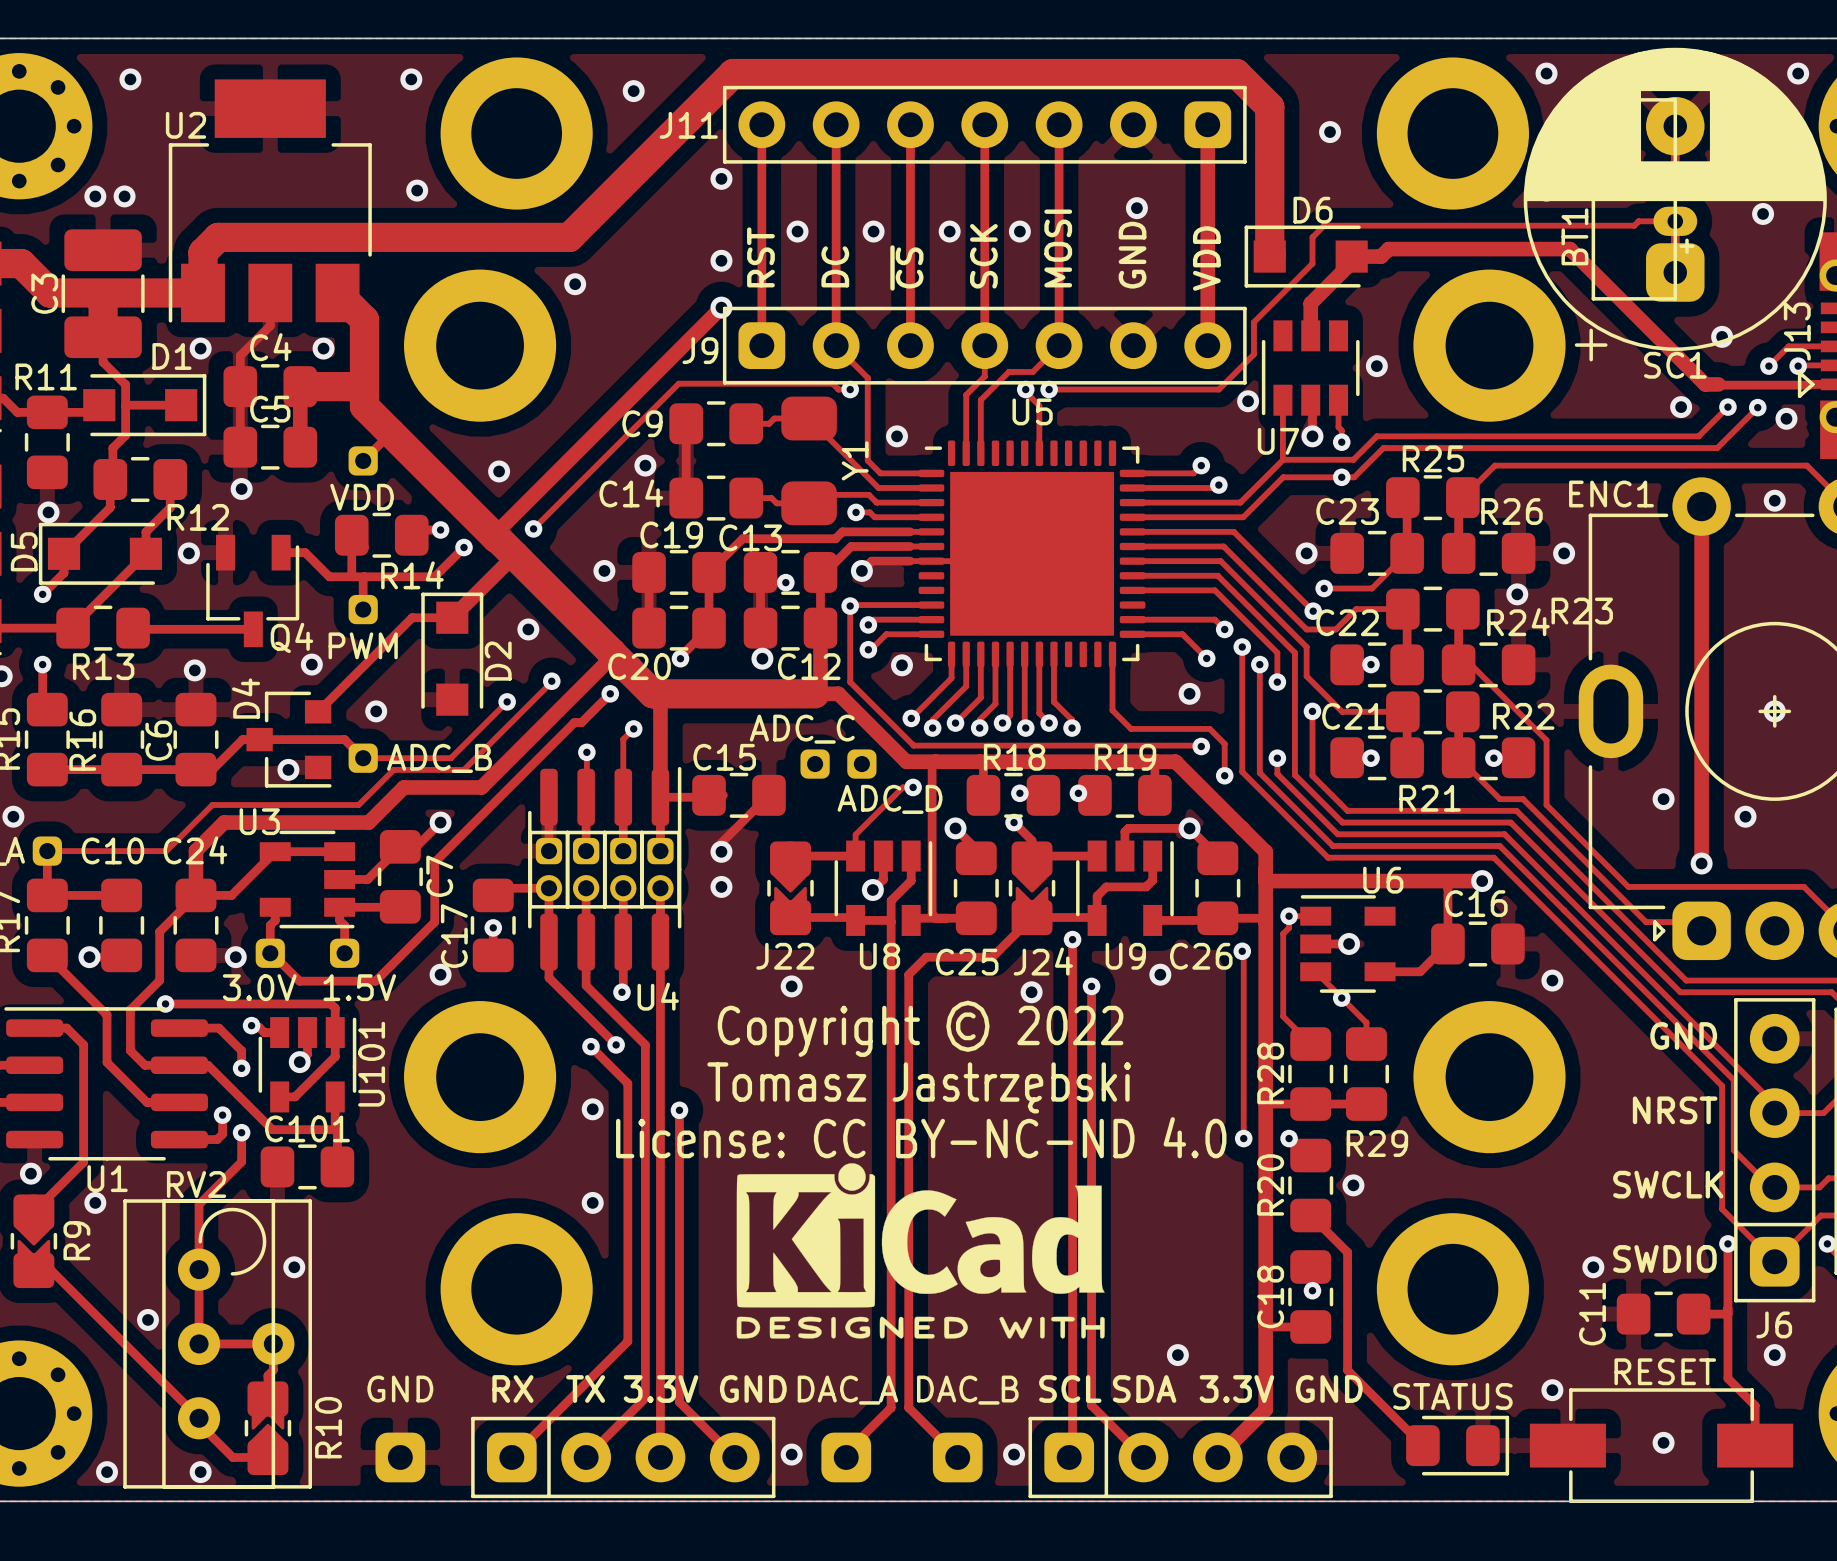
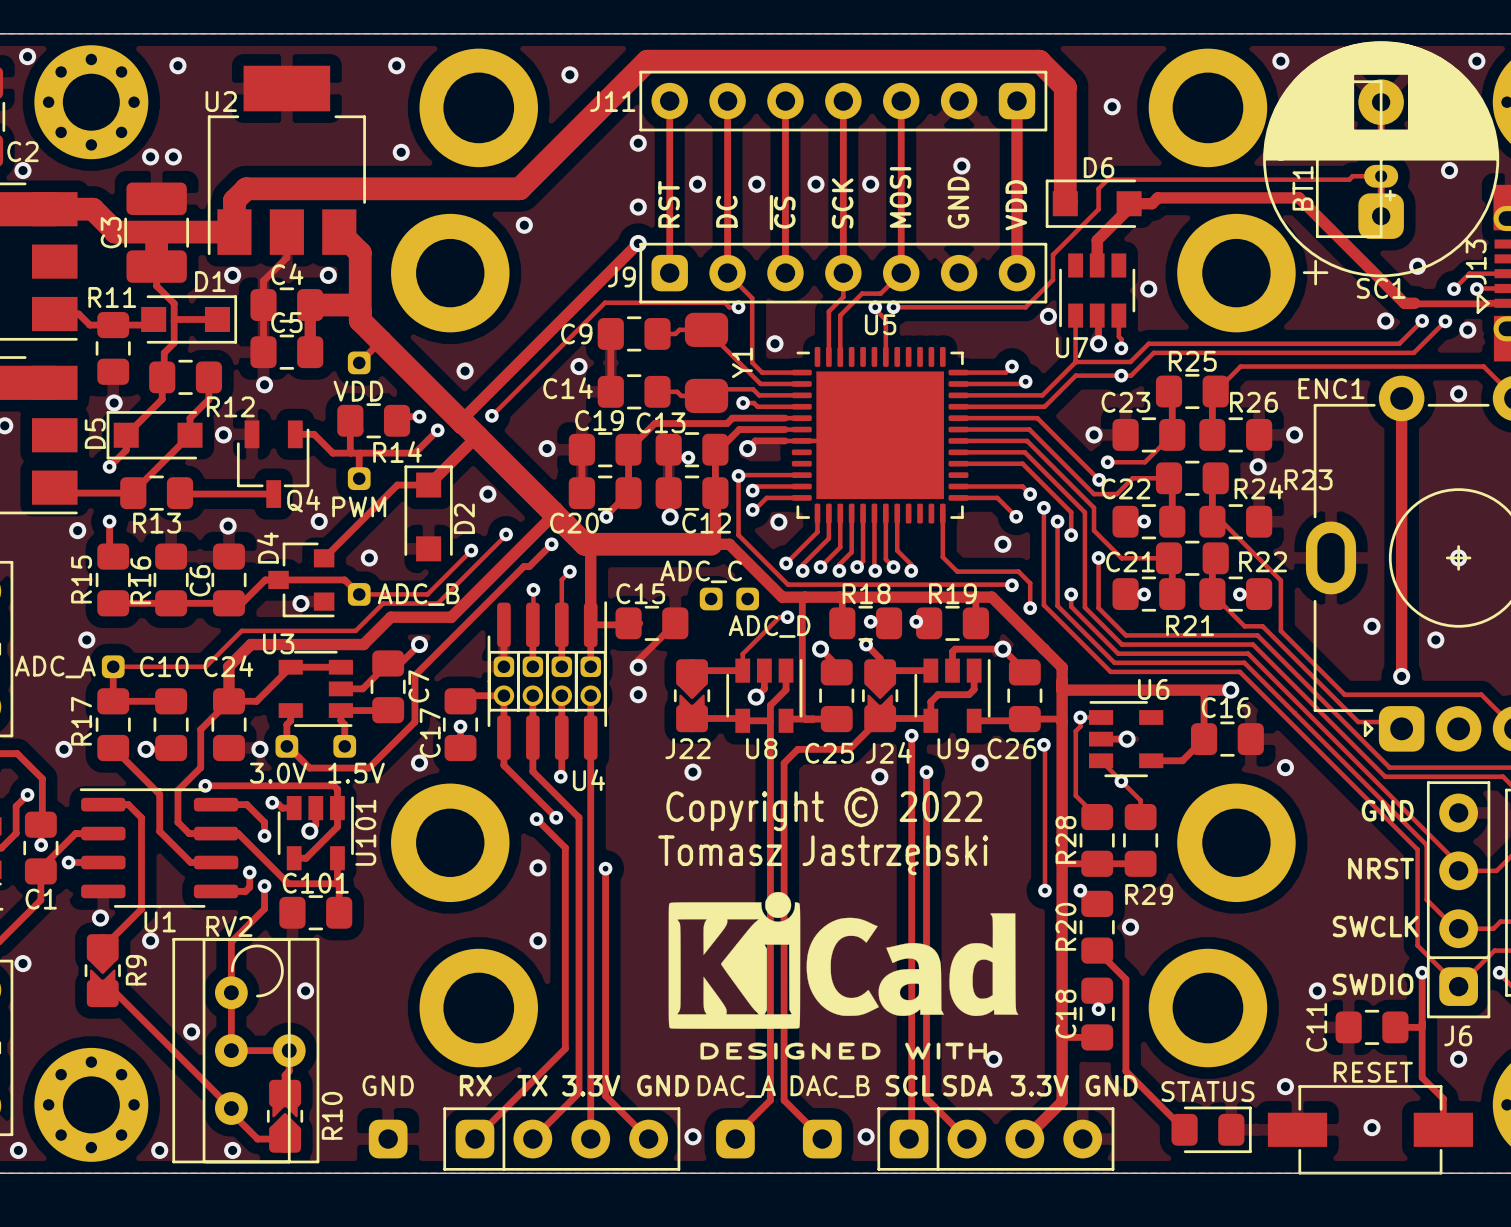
text position: Copyright © 2022 (920, 1028) -> Copyright © 2022 (824, 809)
text position: Tomasz Jastrzębski (919, 1087) -> Tomasz Jastrzębski (823, 855)
text: License: CC BY-NC-ND 4.0 (921, 1137) -> none
drawing: none -> [668, 891, 1019, 1060]
drawing: [736, 1163, 1105, 1339] -> none

